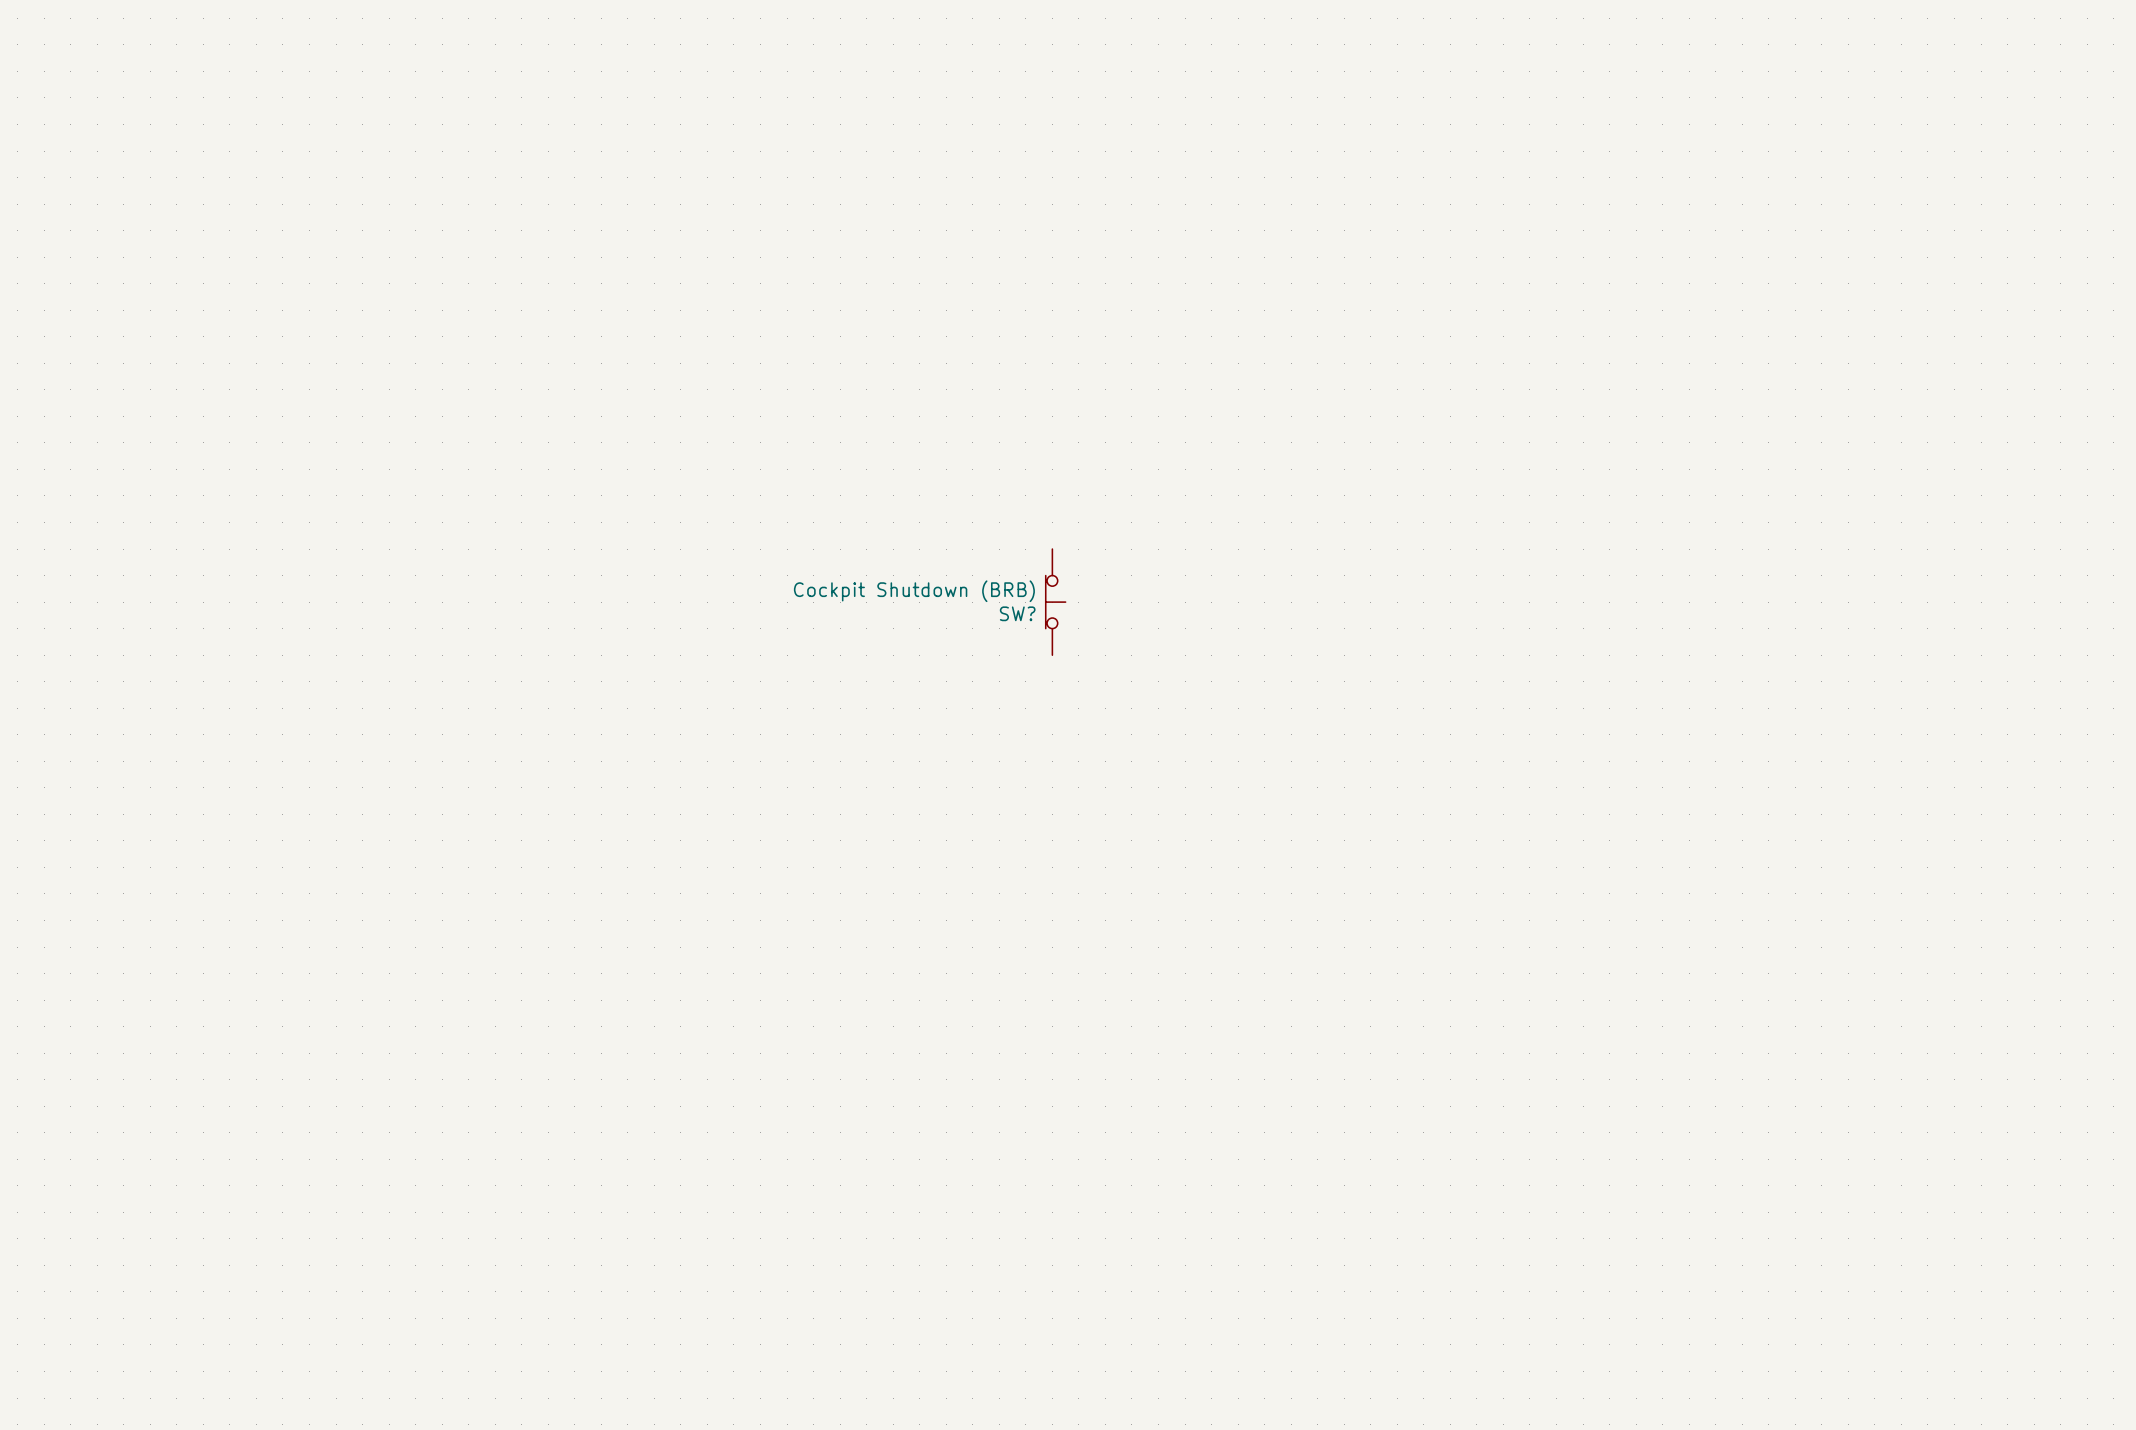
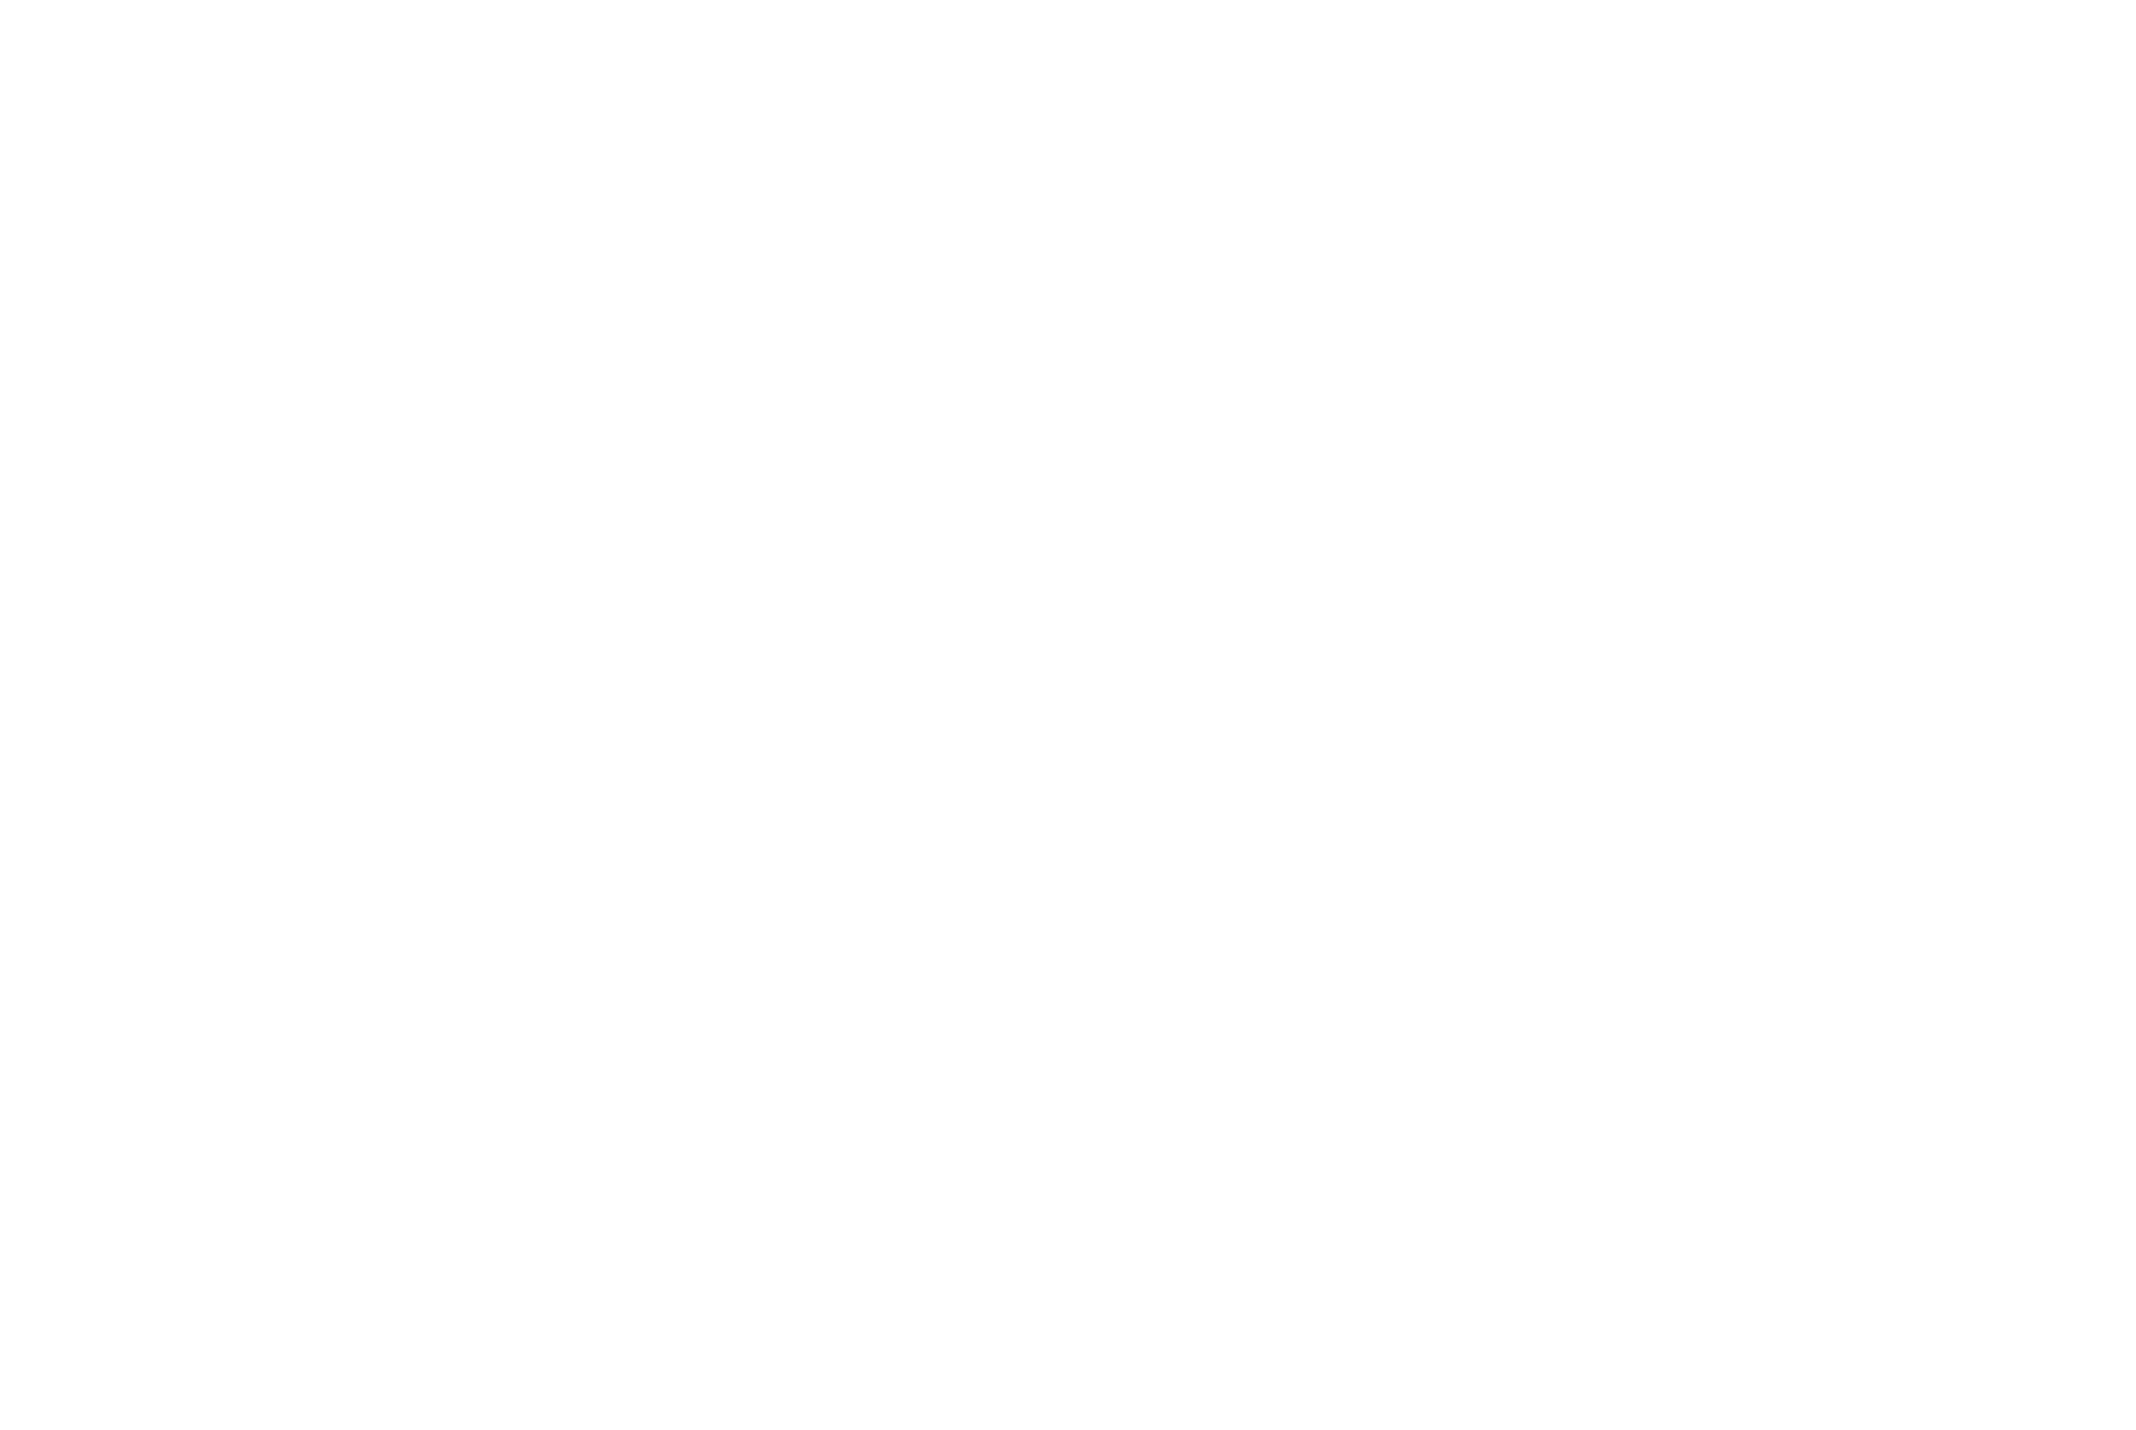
SW?: Cockpit Shutdown (BRB) (1055, 602) -> none

